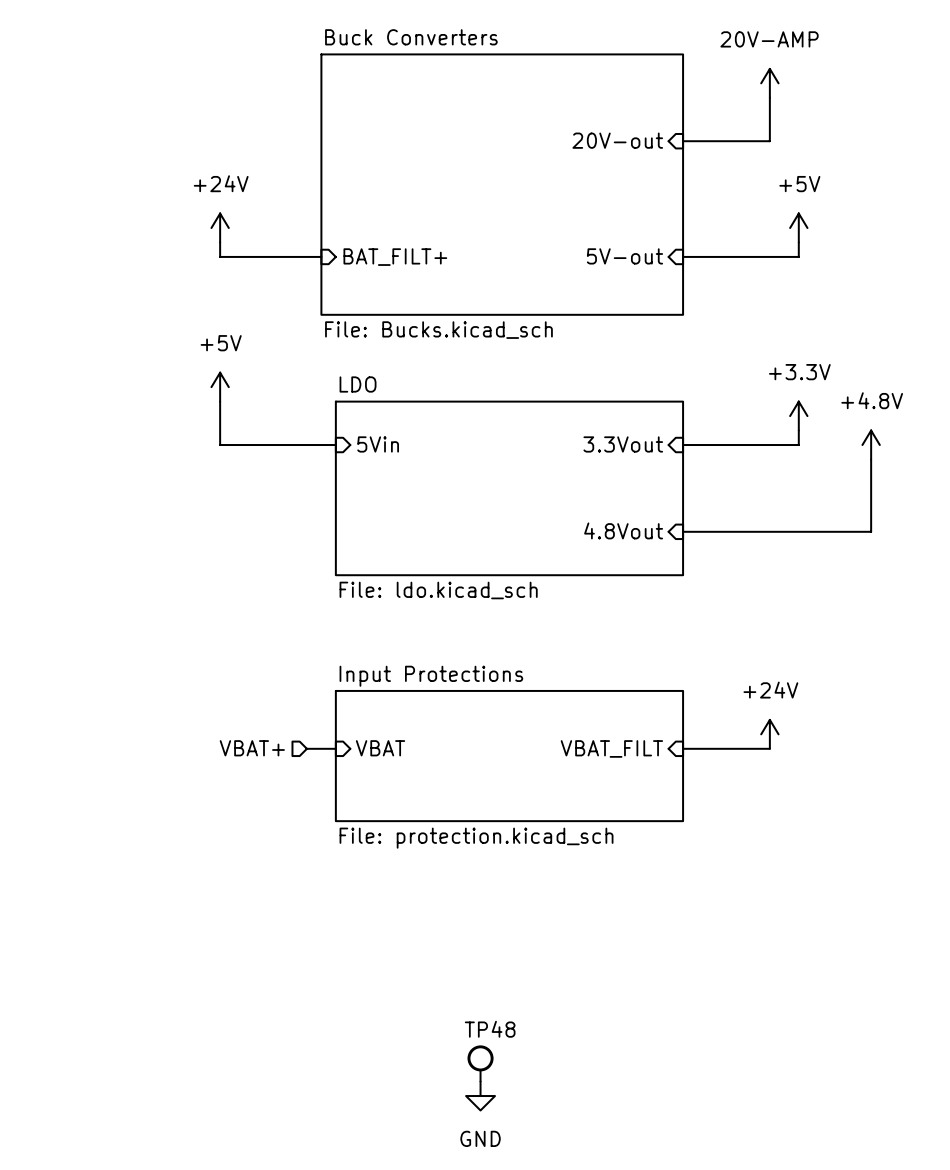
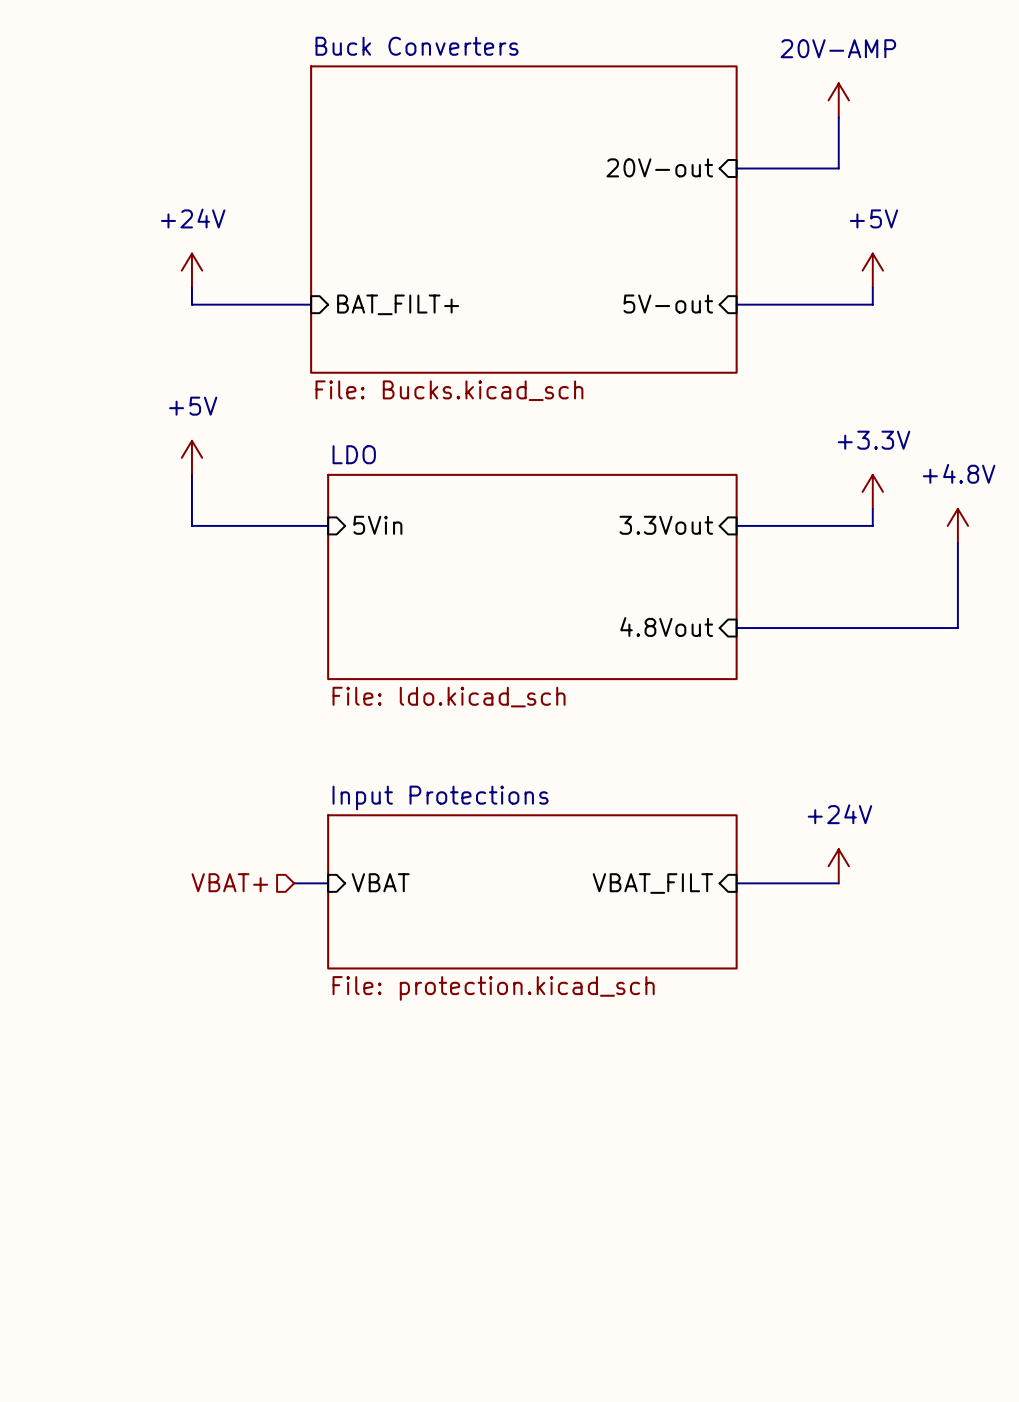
TP48: (480, 1063) -> none
power symbol: GND (480, 1096) -> none

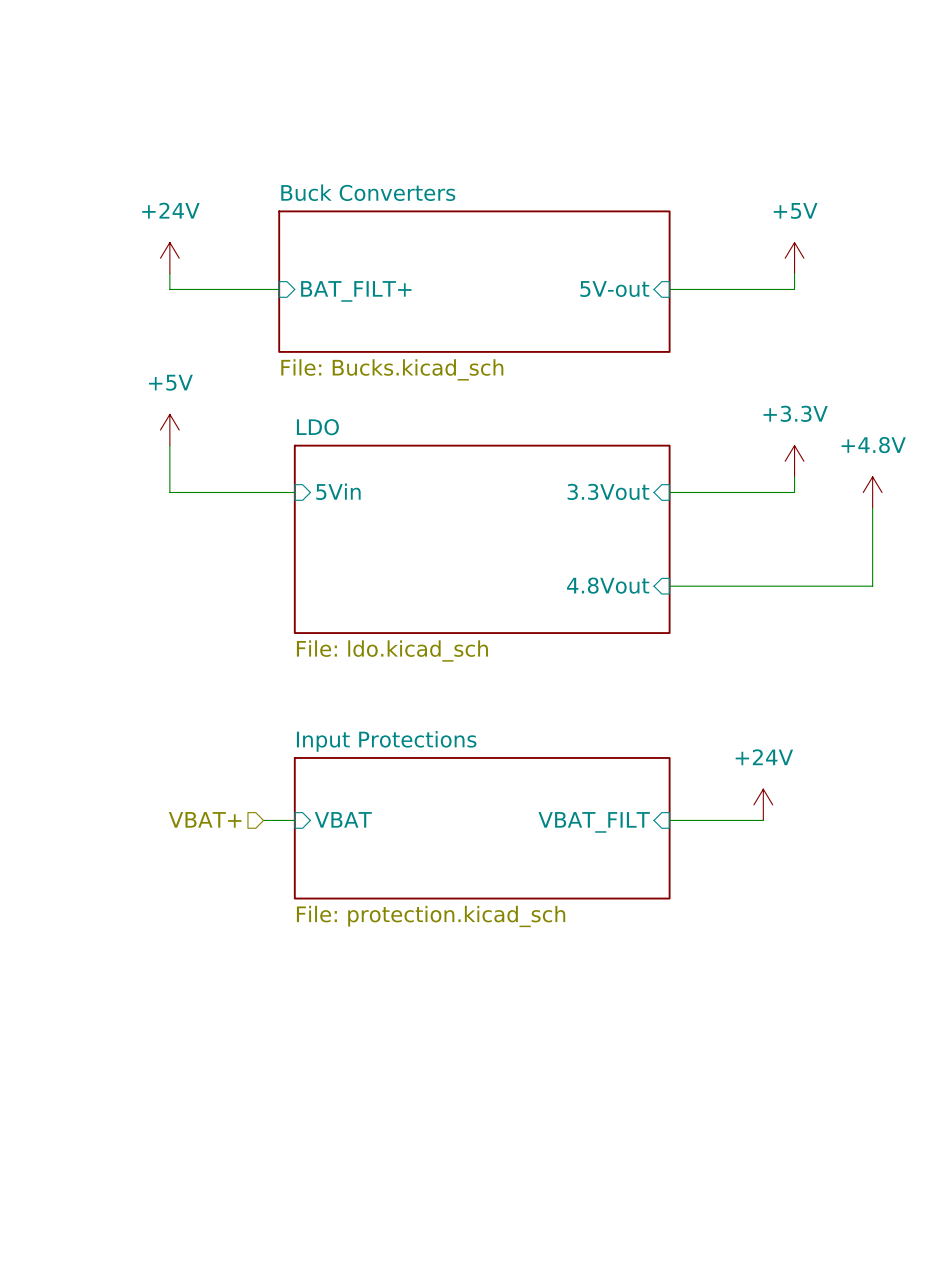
power symbol: 20V-AMP (838, 100) -> none
wire: (838, 117) (838, 168) (736, 168) -> none
sheet pin: 20V-out (659, 167) -> none
sheet Buck Converters: File: Bucks.kicad_sch (523, 219) -> none
sheet Buck Converters: none -> File: Bucks.kicad_sch (474, 281)

